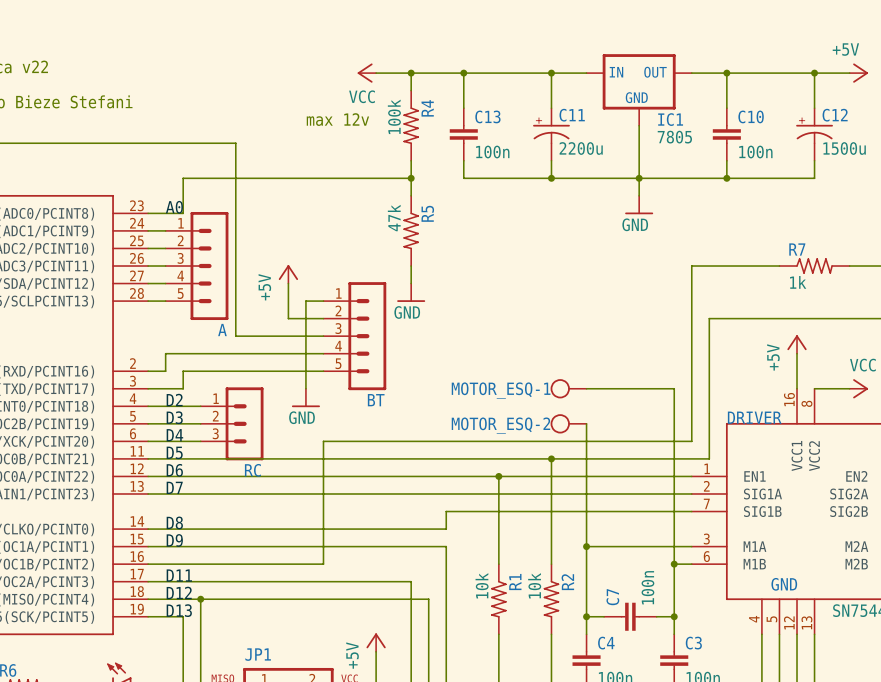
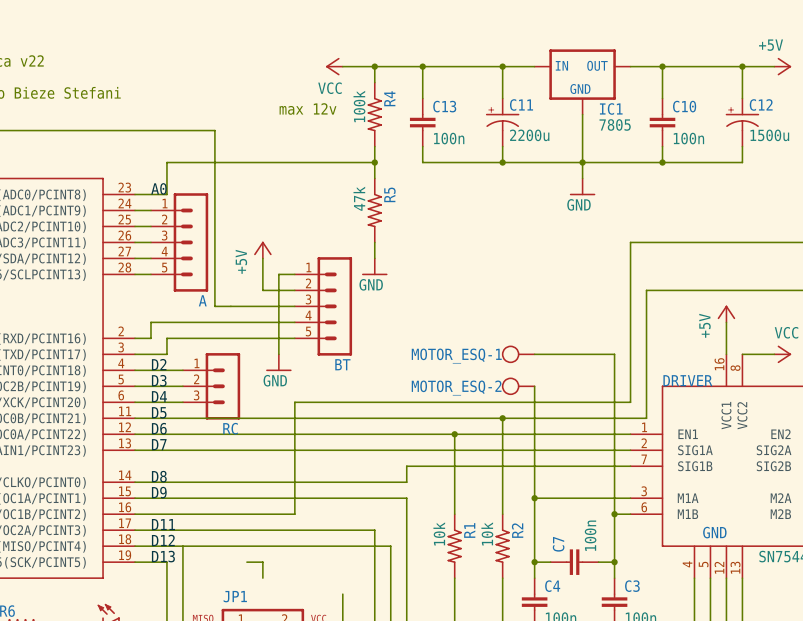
R7: 1k (814, 266) -> none
junction: (200, 599) -> none
wire: none -> (246, 562) (262, 562) (262, 578)
power symbol: +5V (376, 642) -> none

